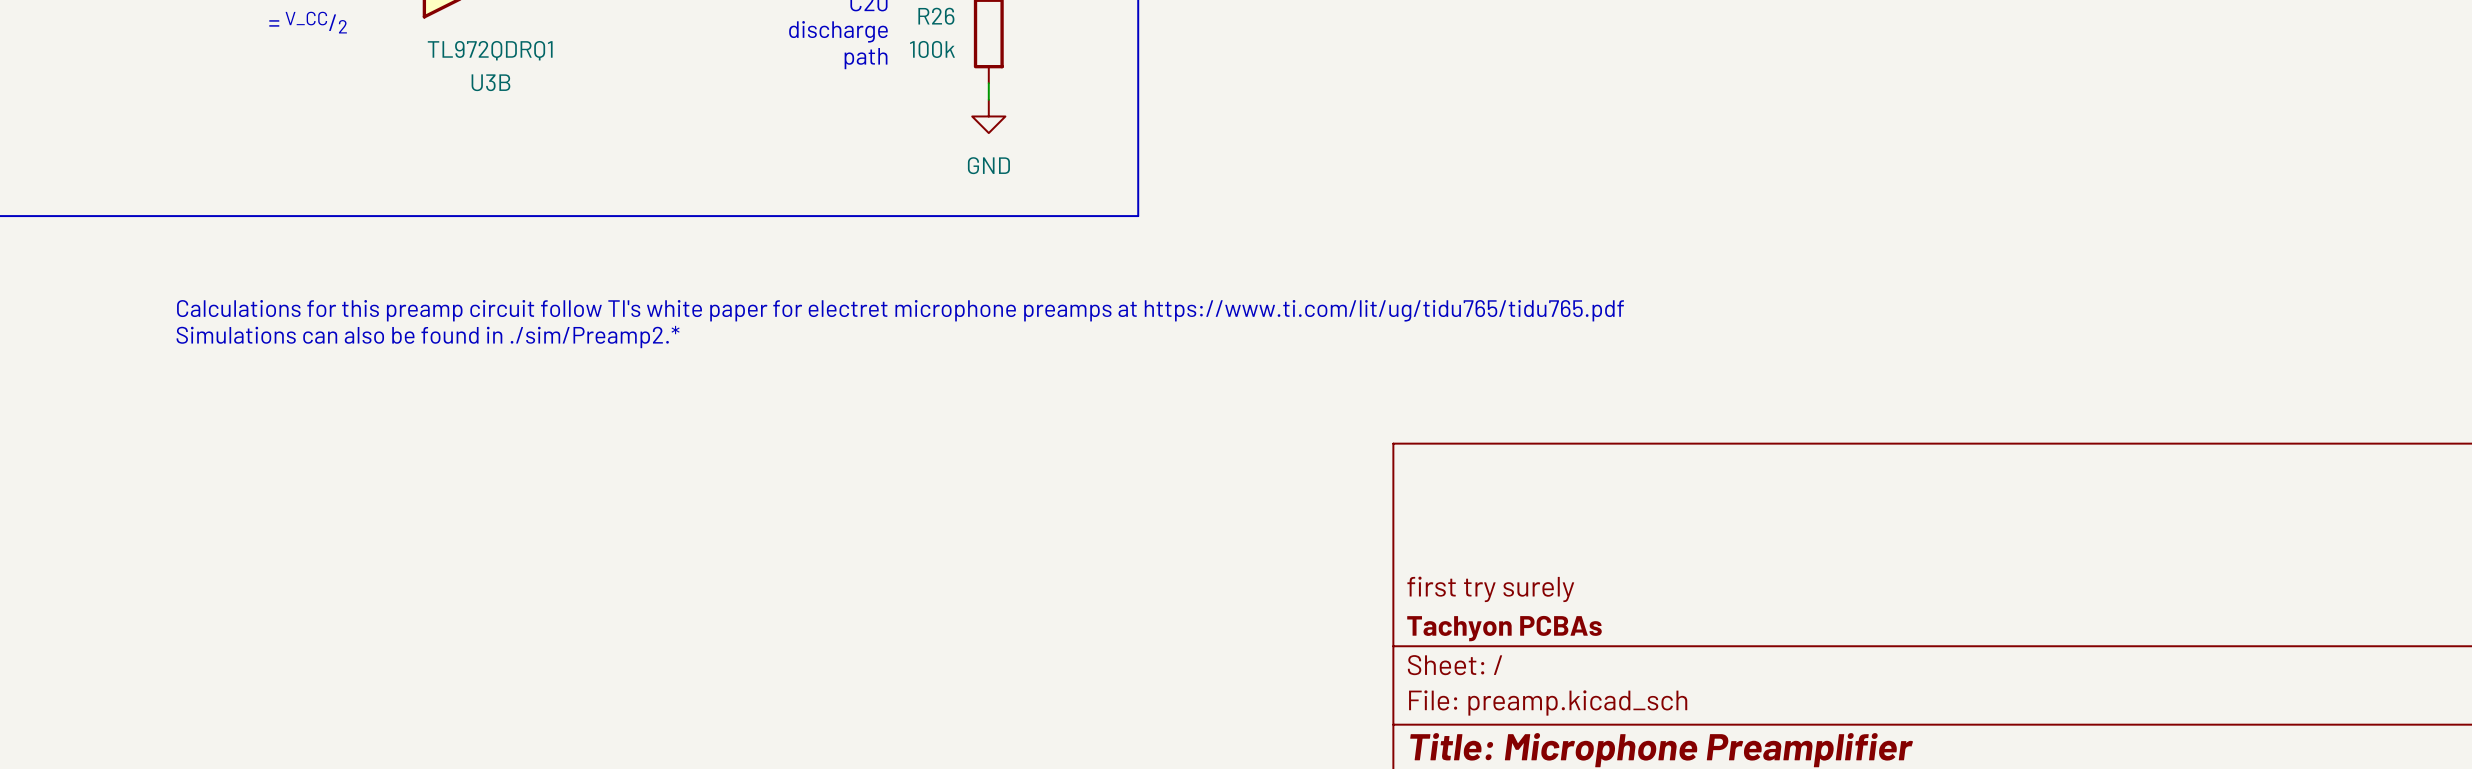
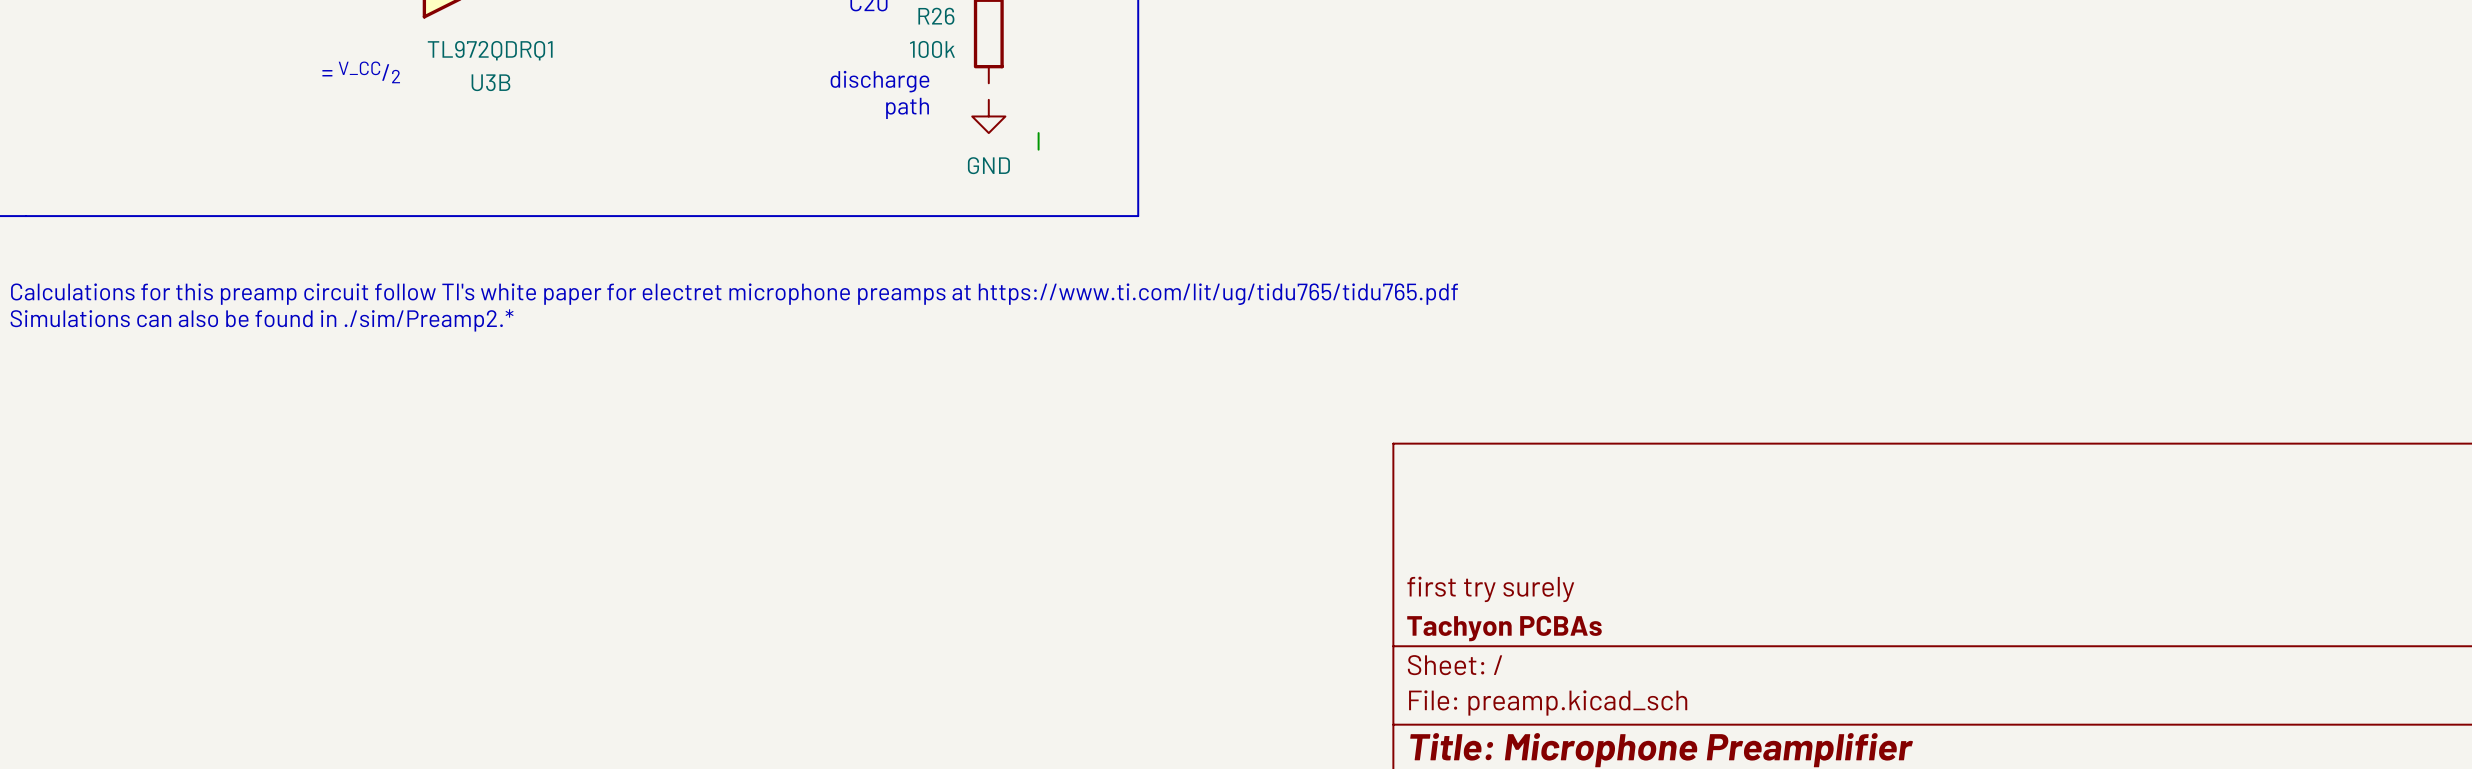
text position: = V_CC/2 (308, 22) -> = V_CC/2 (361, 72)
text position: discharge (838, 31) -> discharge (879, 81)
text position: path (866, 58) -> path (907, 108)
wire: (988, 83) (988, 99) -> (1038, 133) (1038, 149)
text position: Calculations for this preamp circuit follow TI's white paper for electret microphone preamps at https://www.ti.com/lit/ug/tidu765/tidu765.pdf (900, 310) -> Calculations for this preamp circuit follow TI's white paper for electret microphone preamps at https://www.ti.com/lit/ug/tidu765/tidu765.pdf (734, 294)
text position: Simulations can also be found in ./sim/Preamp2.* (428, 337) -> Simulations can also be found in ./sim/Preamp2.* (262, 320)

